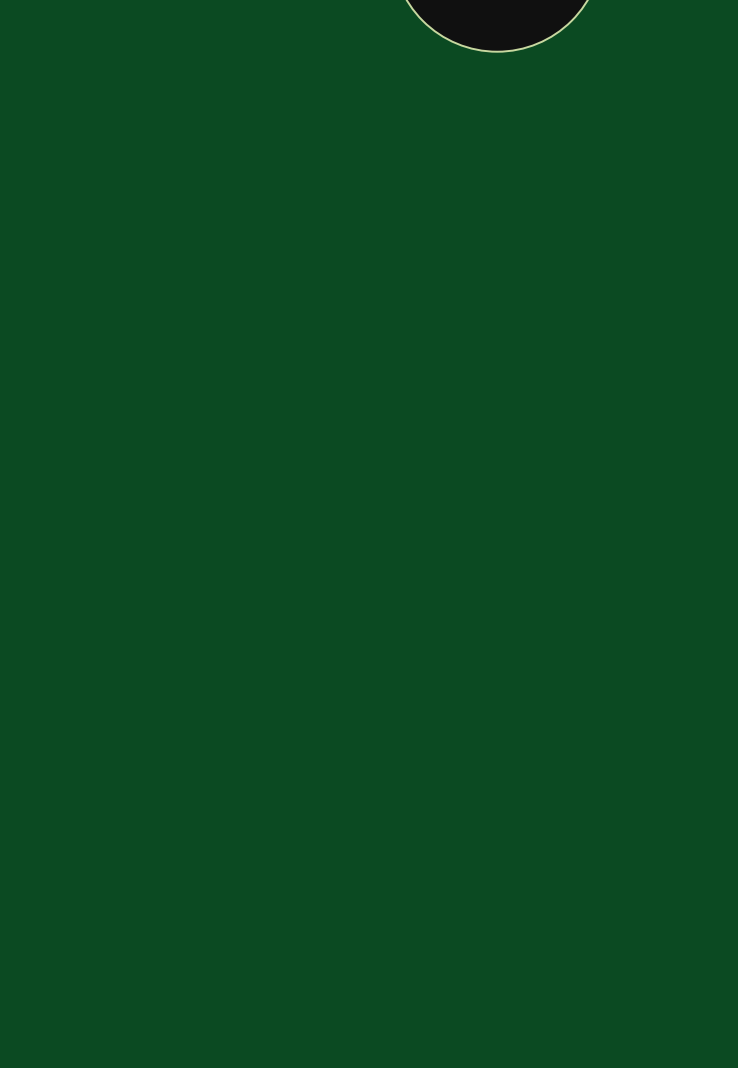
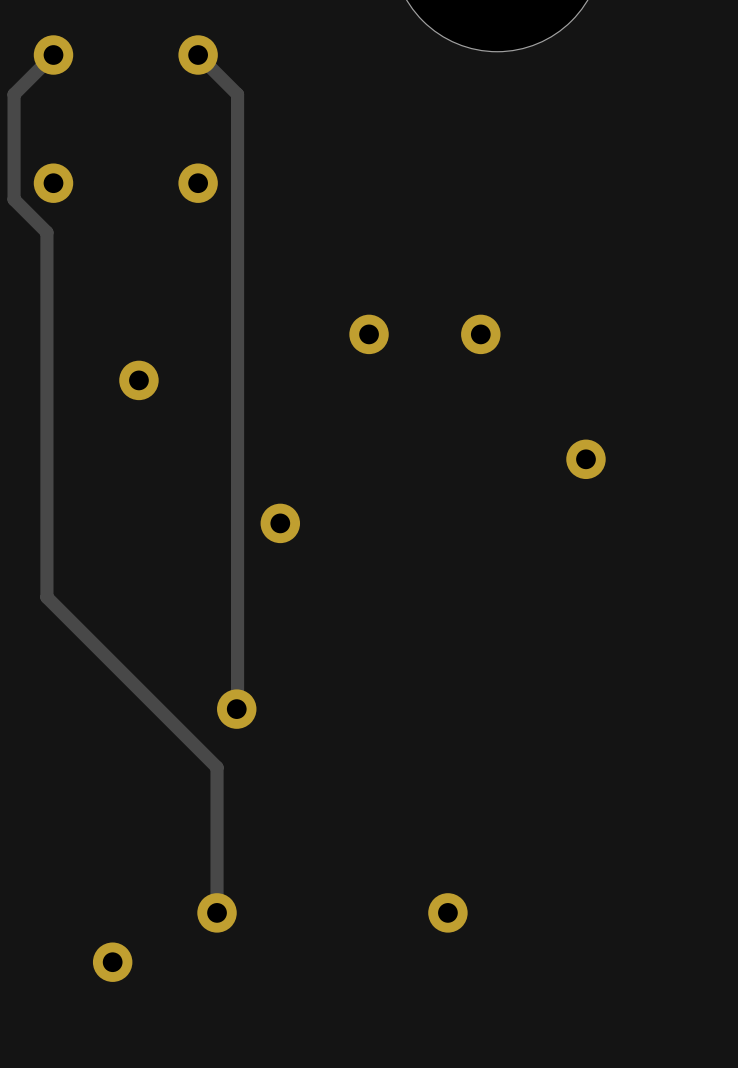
track: none -> (53, 55) (14, 94) (14, 199) (46, 232) (46, 597) (217, 767) (217, 912)
via: none -> (53, 55)
track: none -> (198, 55) (237, 94) (237, 708)
via: none -> (198, 55)
via: none -> (53, 183)
via: none -> (198, 183)
via: none -> (369, 334)
via: none -> (480, 334)
via: none -> (138, 380)
via: none -> (585, 459)
via: none -> (280, 523)
via: none -> (236, 709)
via: none -> (217, 912)
via: none -> (447, 912)
via: none -> (112, 962)

